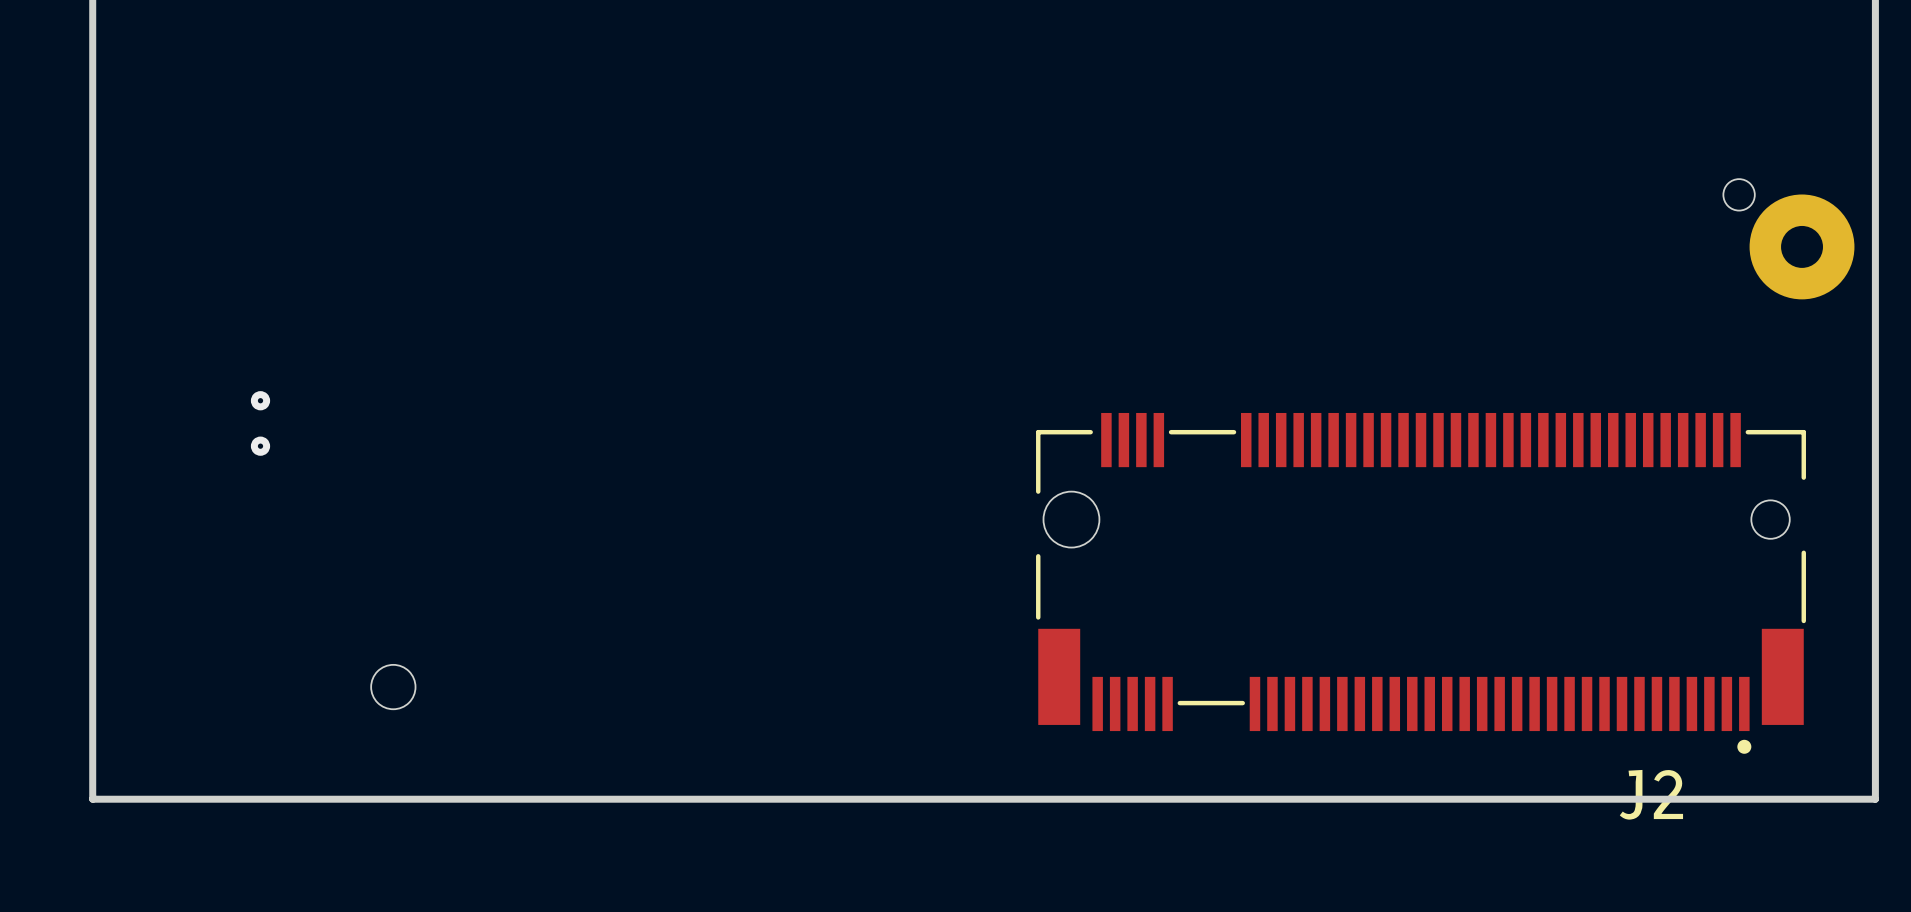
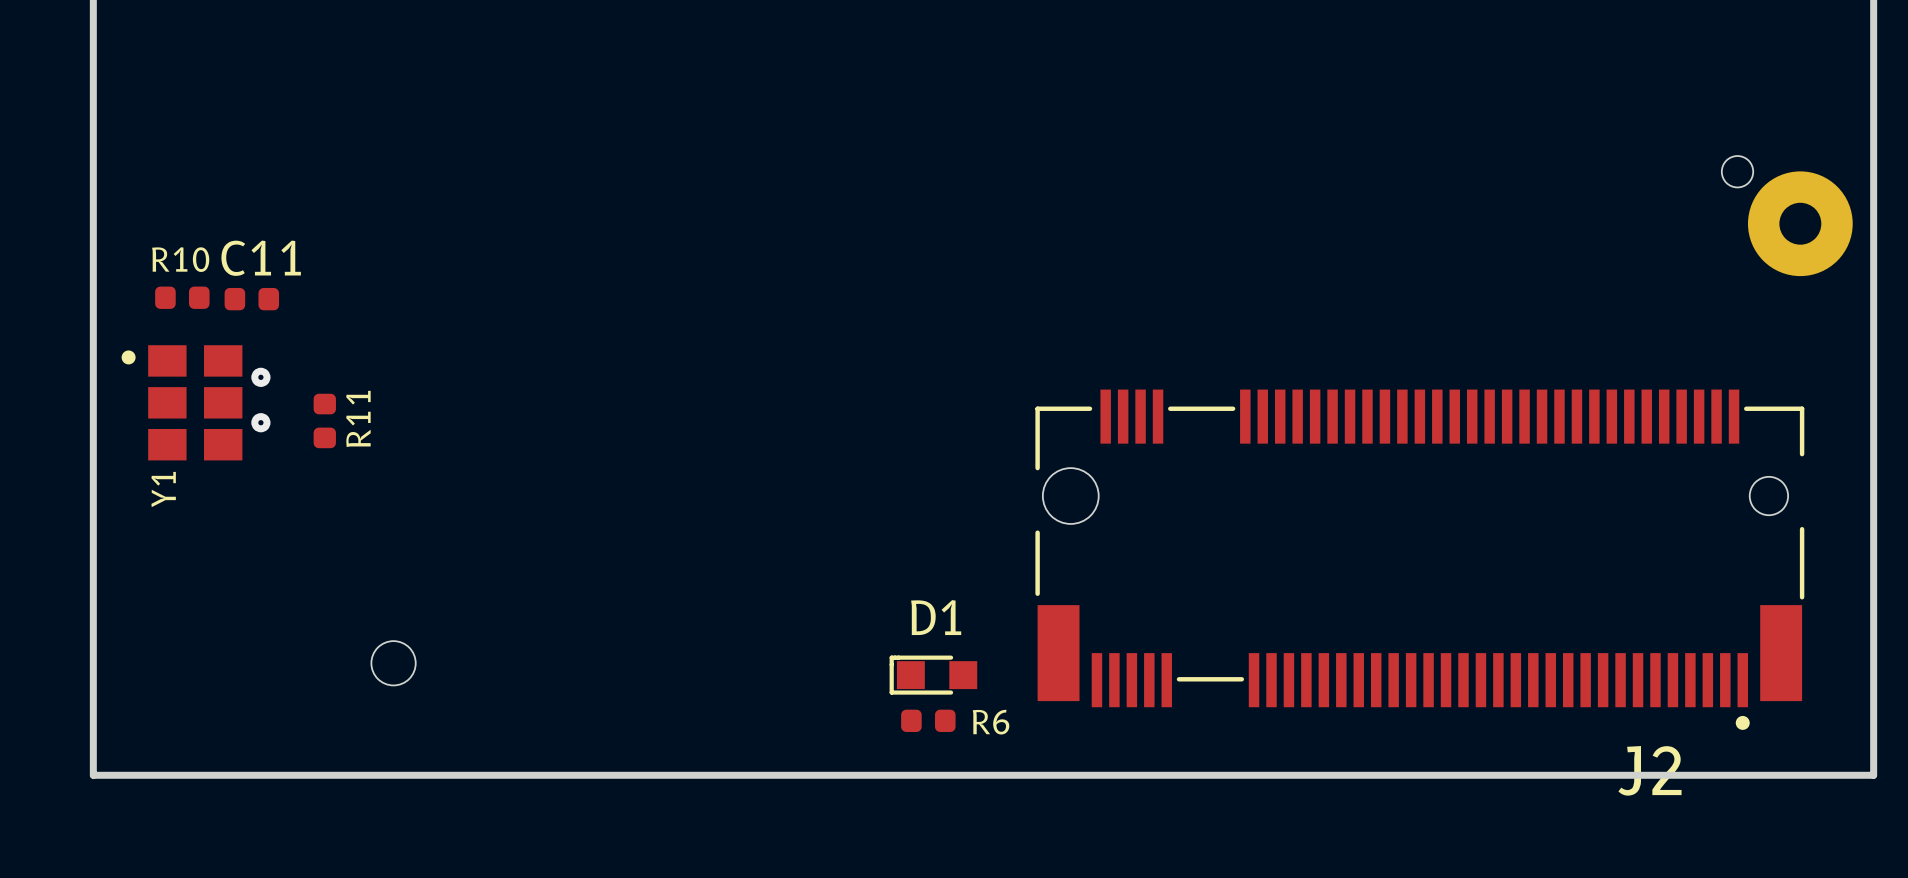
R10: none -> (182, 297)
C11: none -> (251, 299)
Y1: none -> (182, 402)
R11: none -> (324, 420)
D1: none -> (933, 675)
R6: none -> (928, 720)

